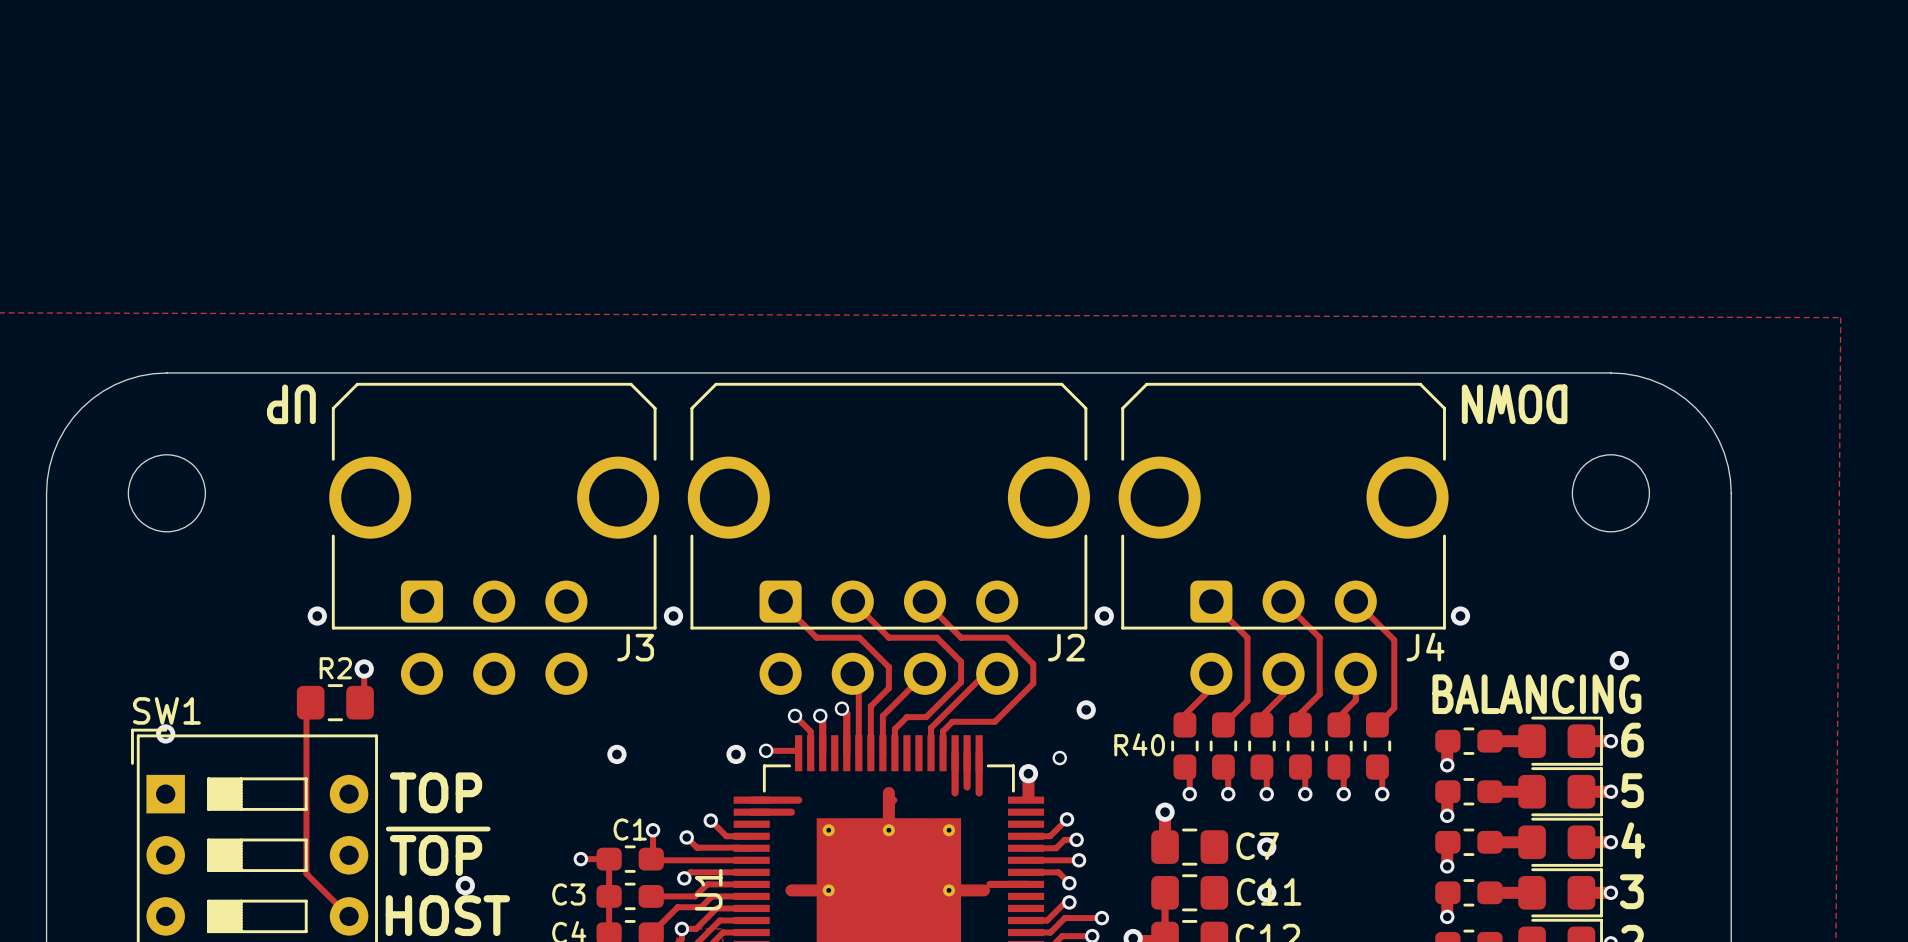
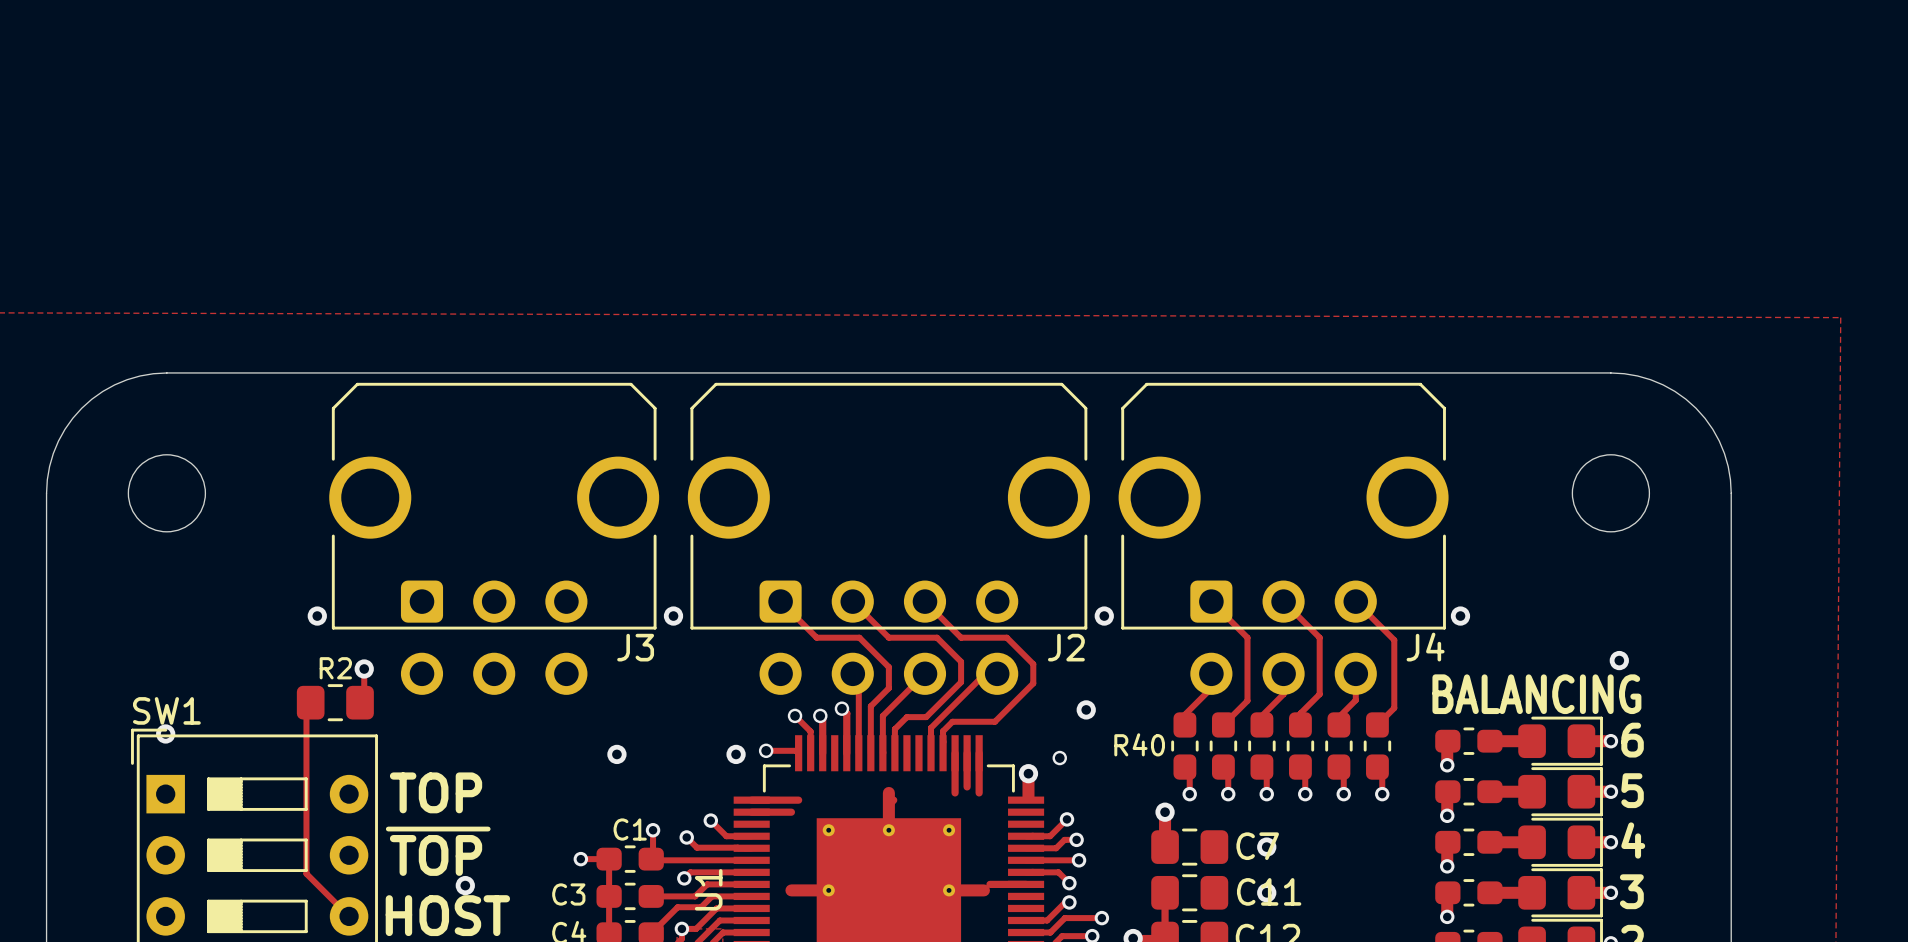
text: UP (291, 404) -> none
text: DOWN (1514, 404) -> none

